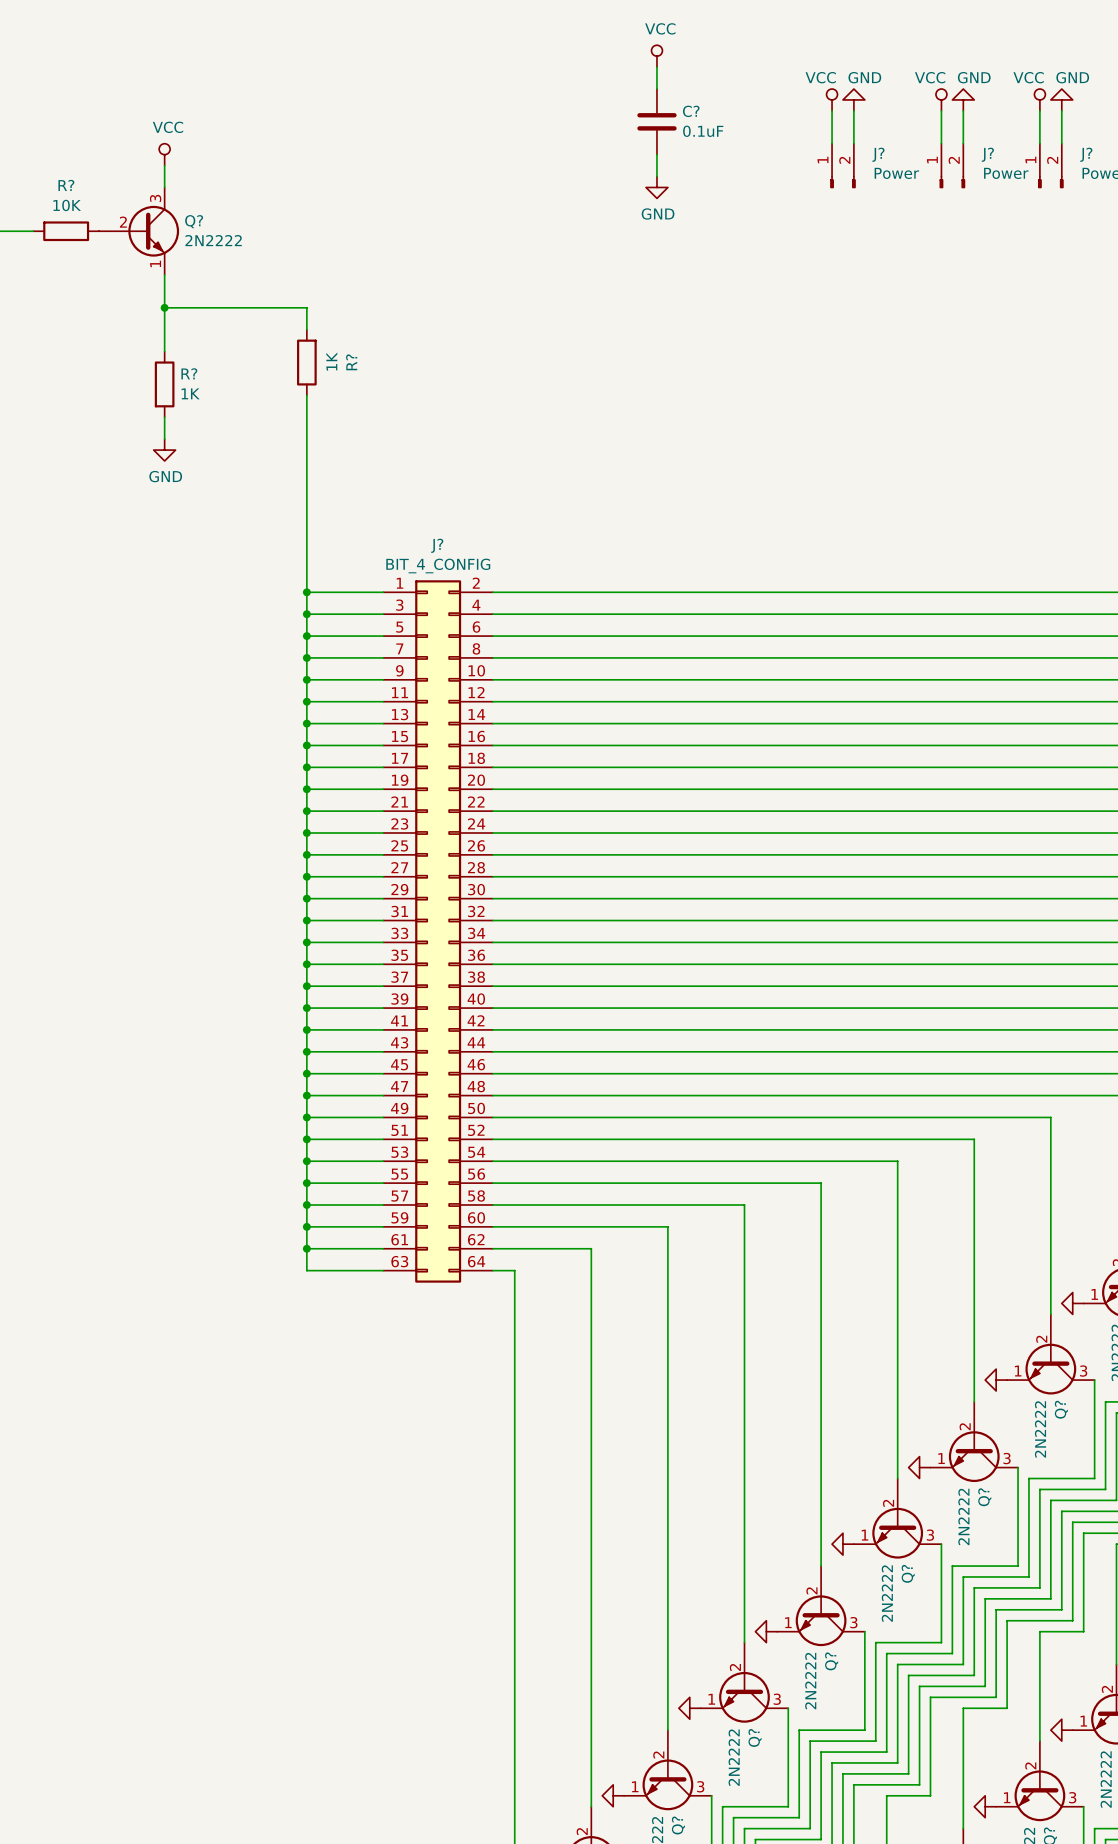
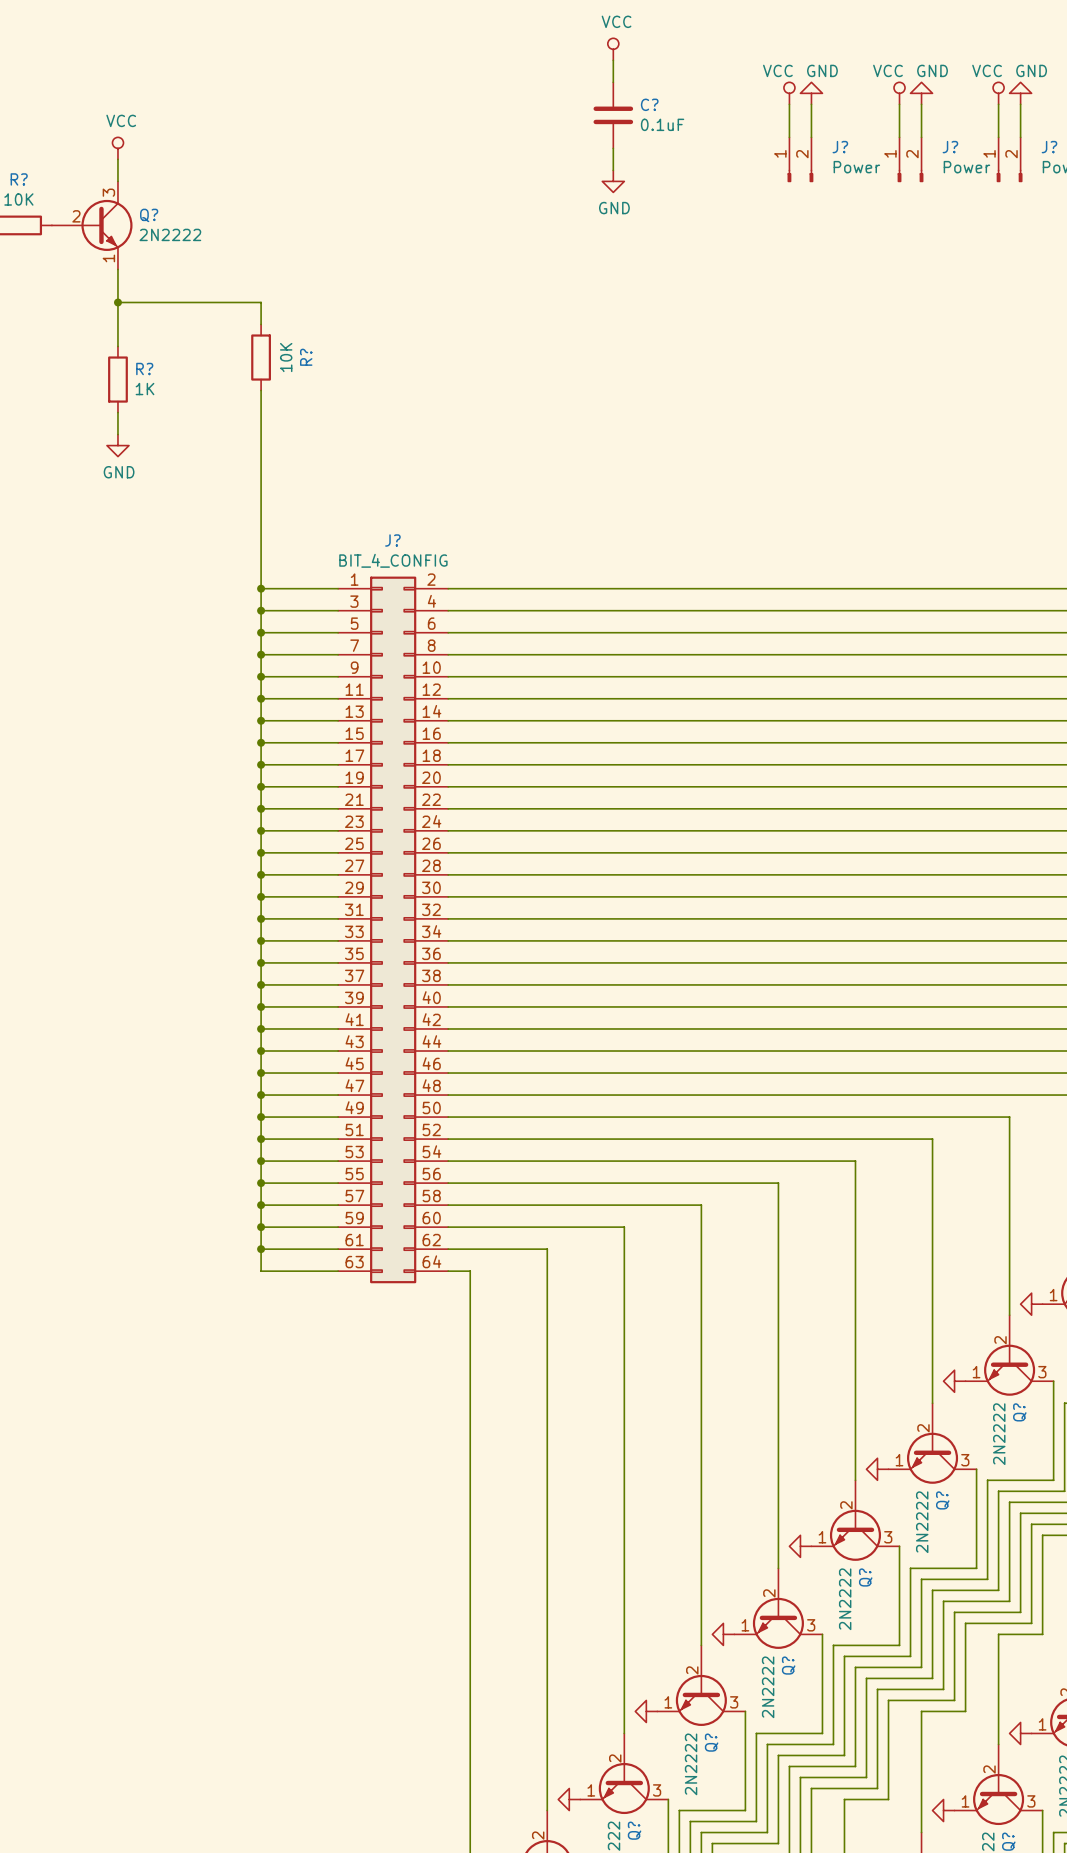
R? value: 1K (331, 361) -> 10K (286, 357)

